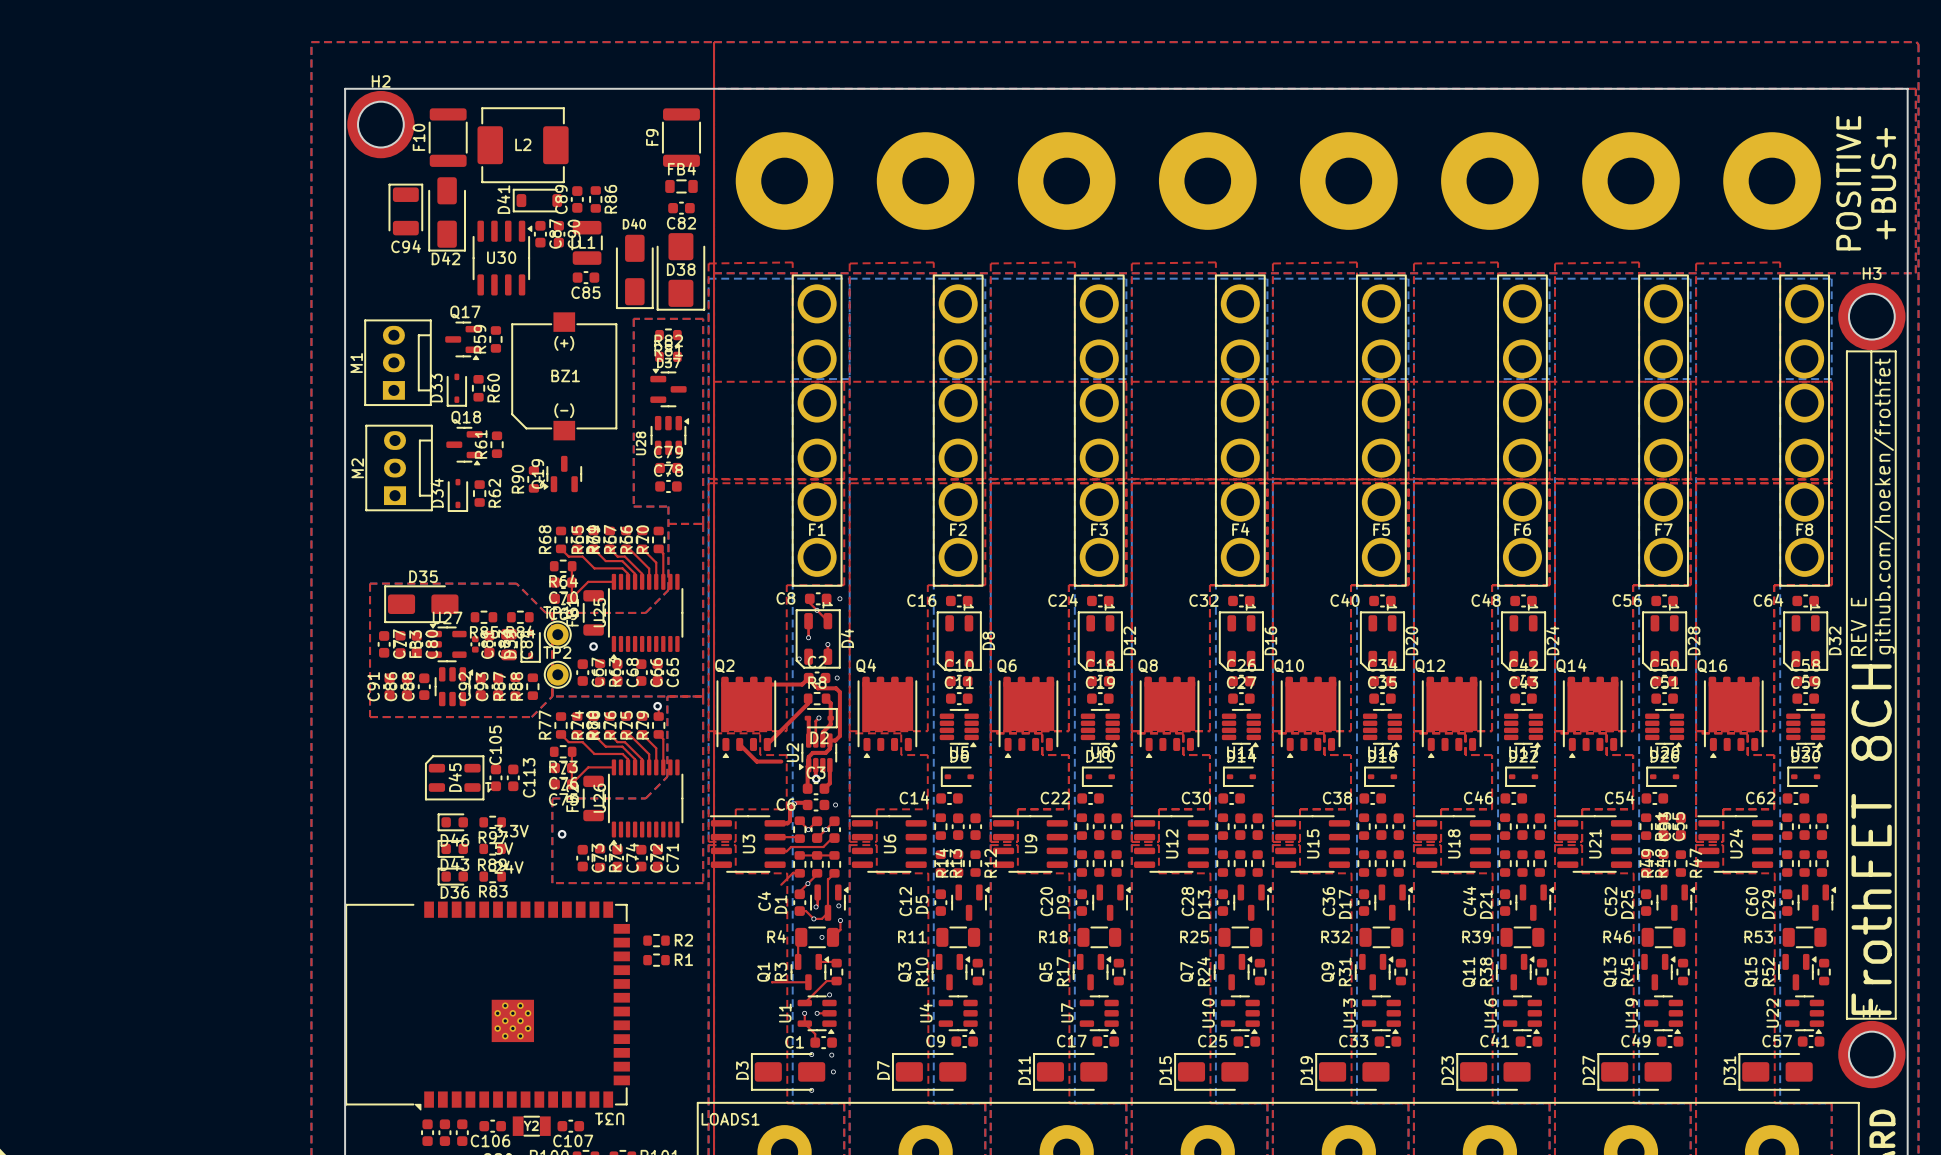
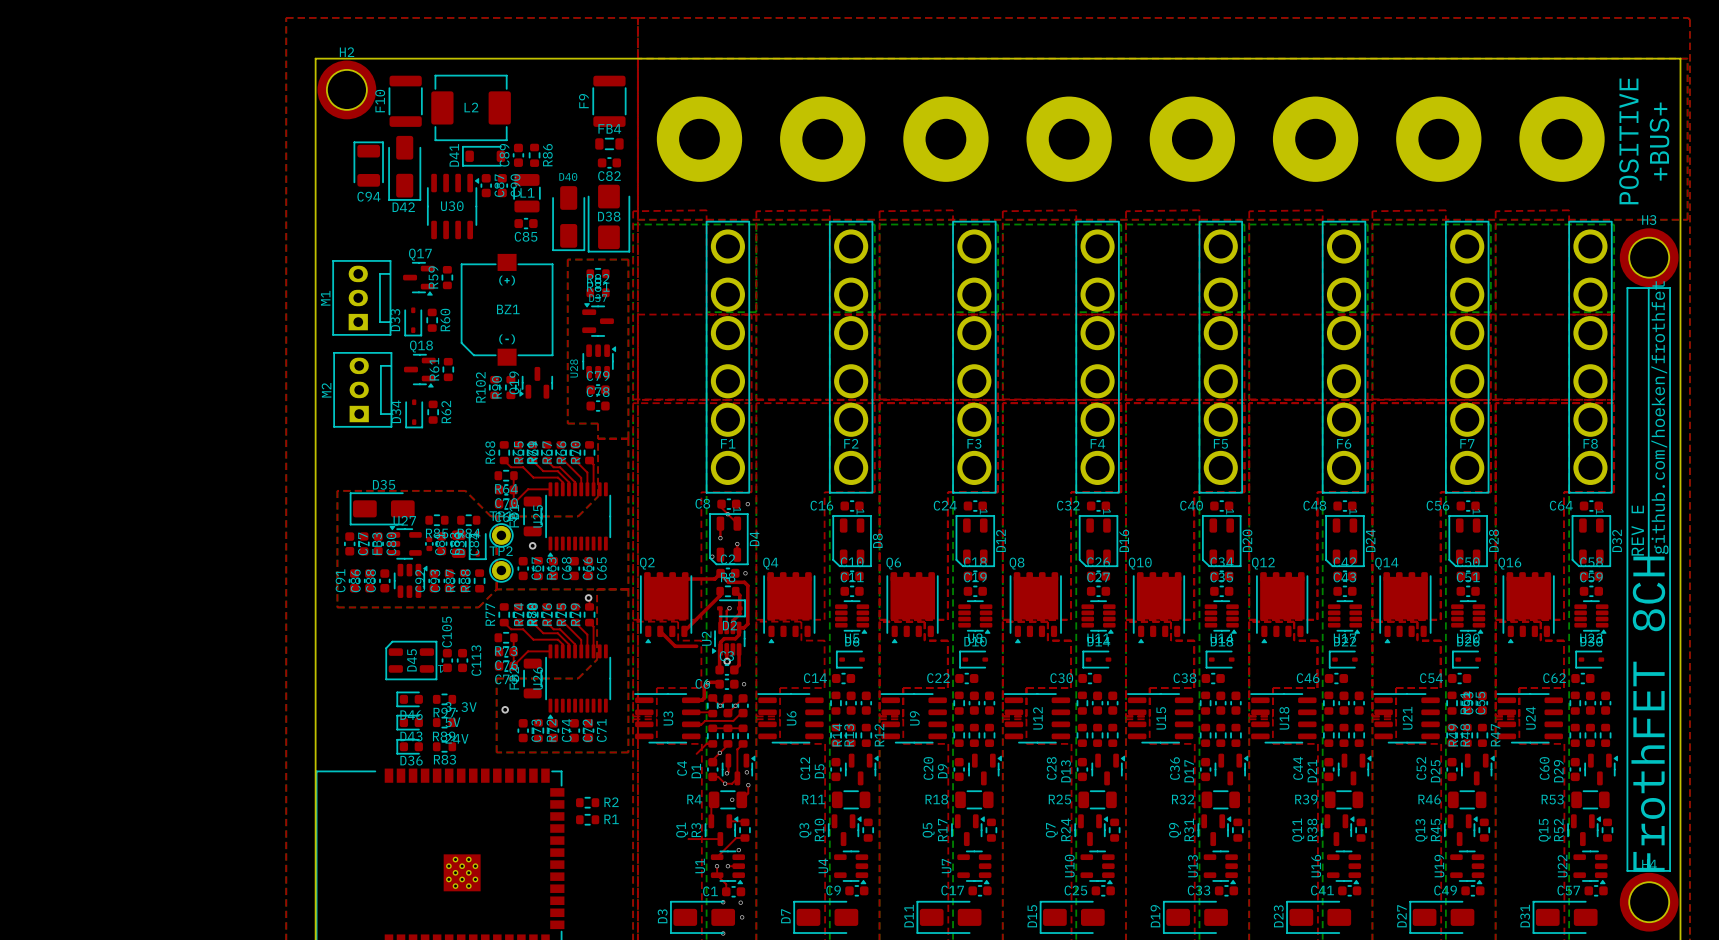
R102: none -> (494, 387)
Q19 position: (562, 474) -> (536, 382)
R90 position: (533, 479) -> (510, 387)

